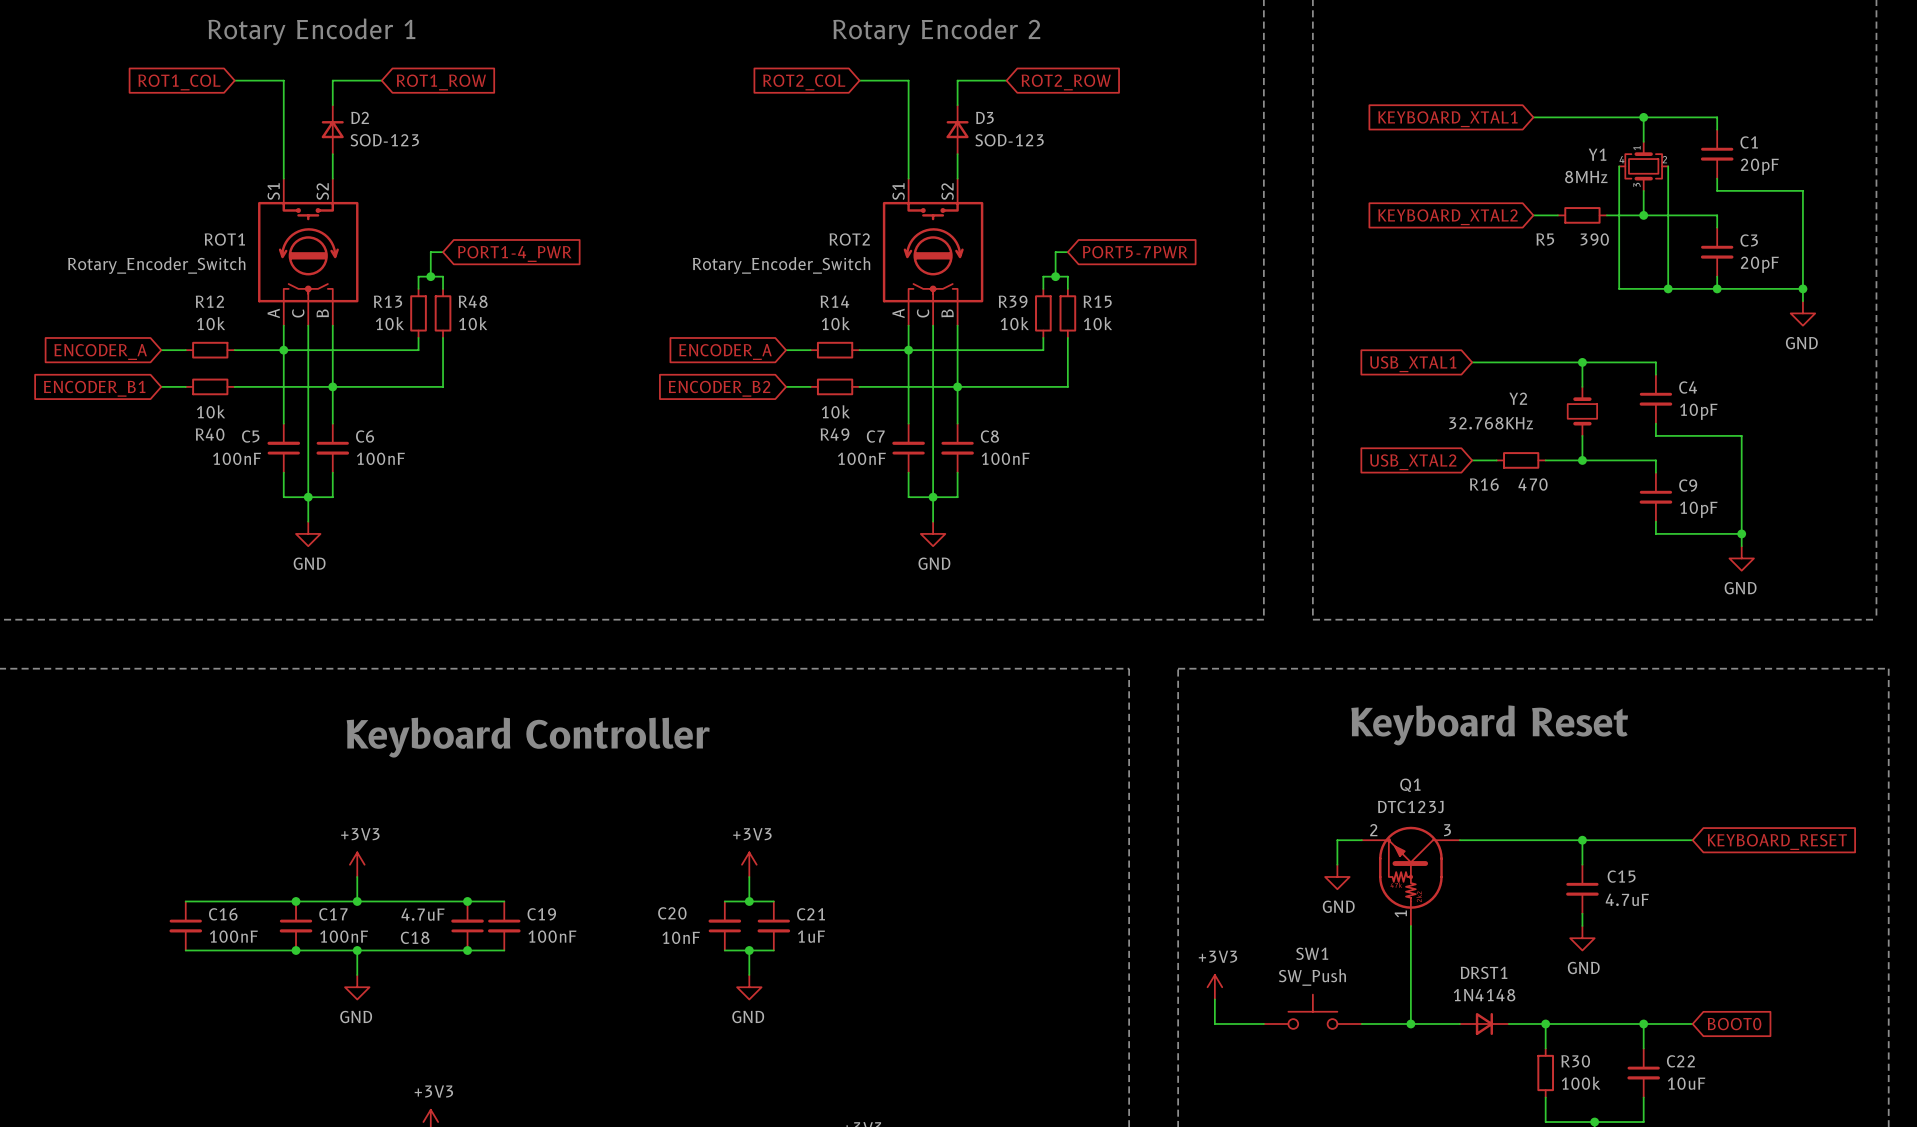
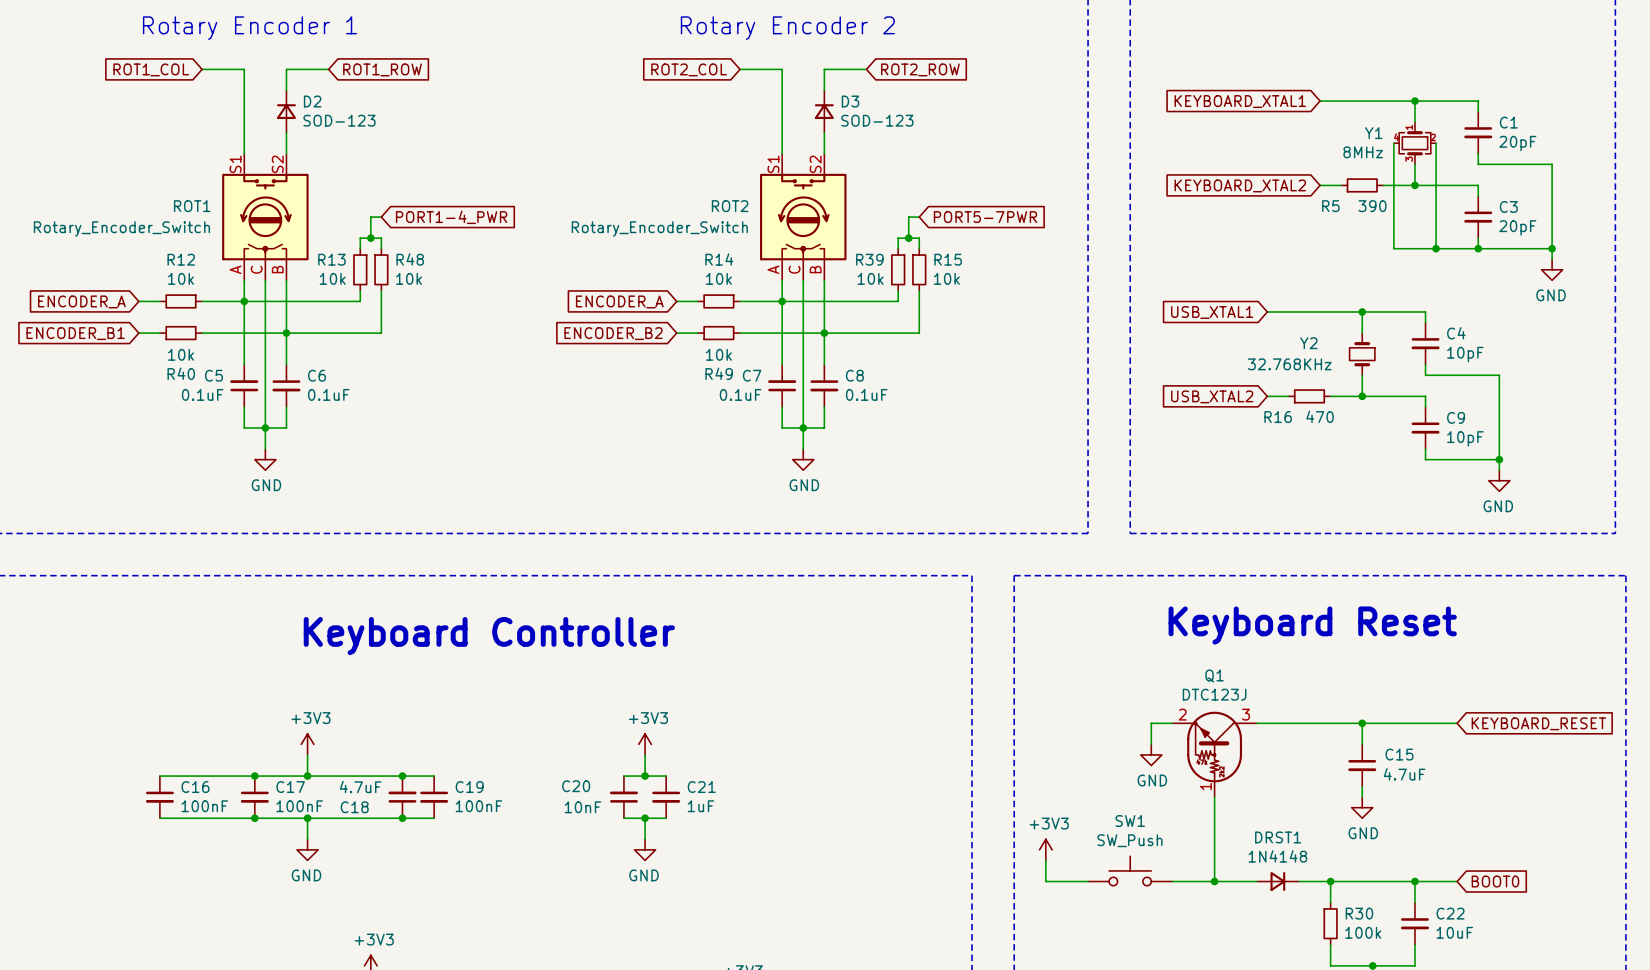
C5 value: 100nF (237, 458) -> 0.1uF (202, 394)
C6 value: 100nF (380, 458) -> 0.1uF (328, 394)
C7 value: 100nF (861, 458) -> 0.1uF (740, 394)
C8 value: 100nF (1005, 458) -> 0.1uF (866, 394)

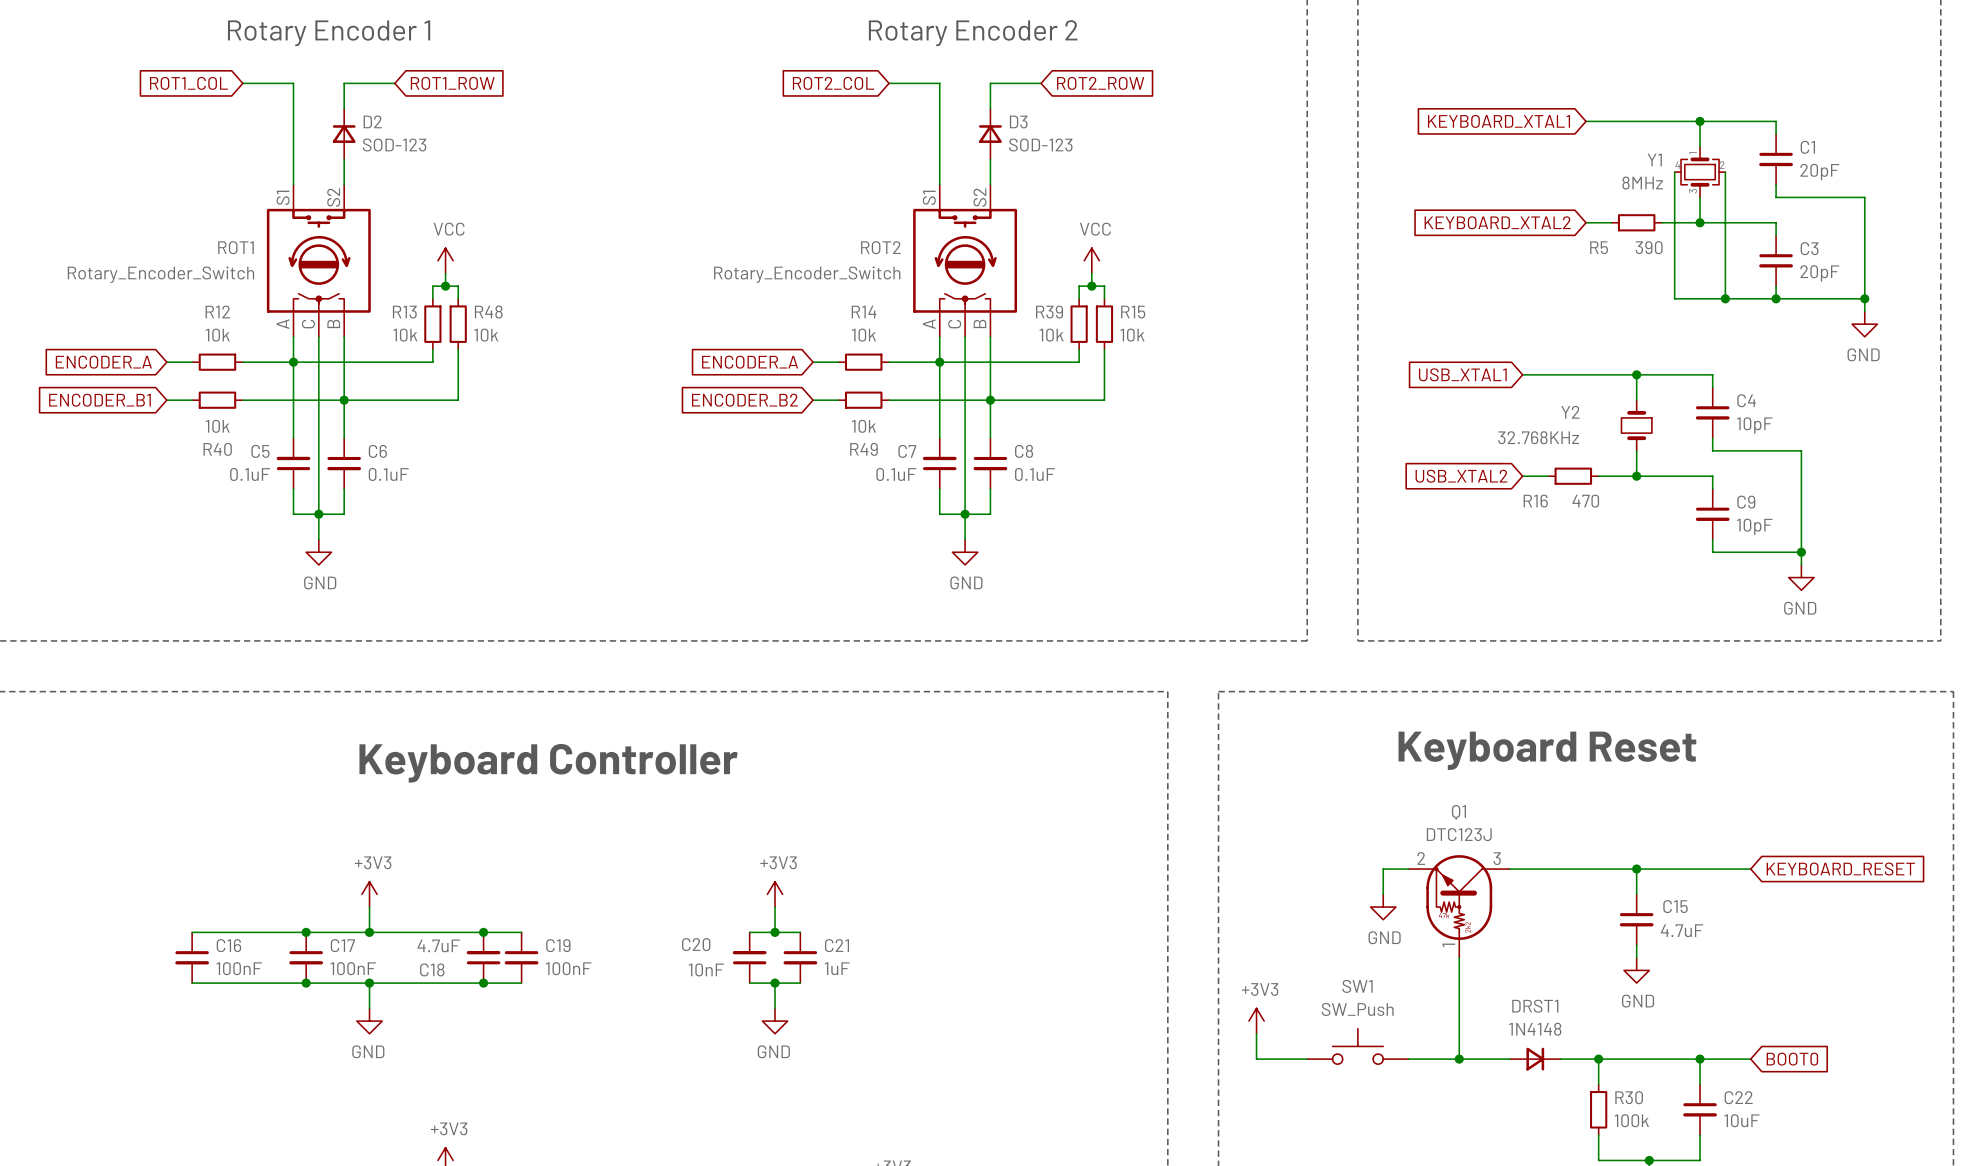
power symbol: none -> VCC (445, 260)
global label: PORT1-4_PWR (451, 217) -> none
power symbol: none -> VCC (1091, 260)
global label: PORT5-7PWR (985, 217) -> none

